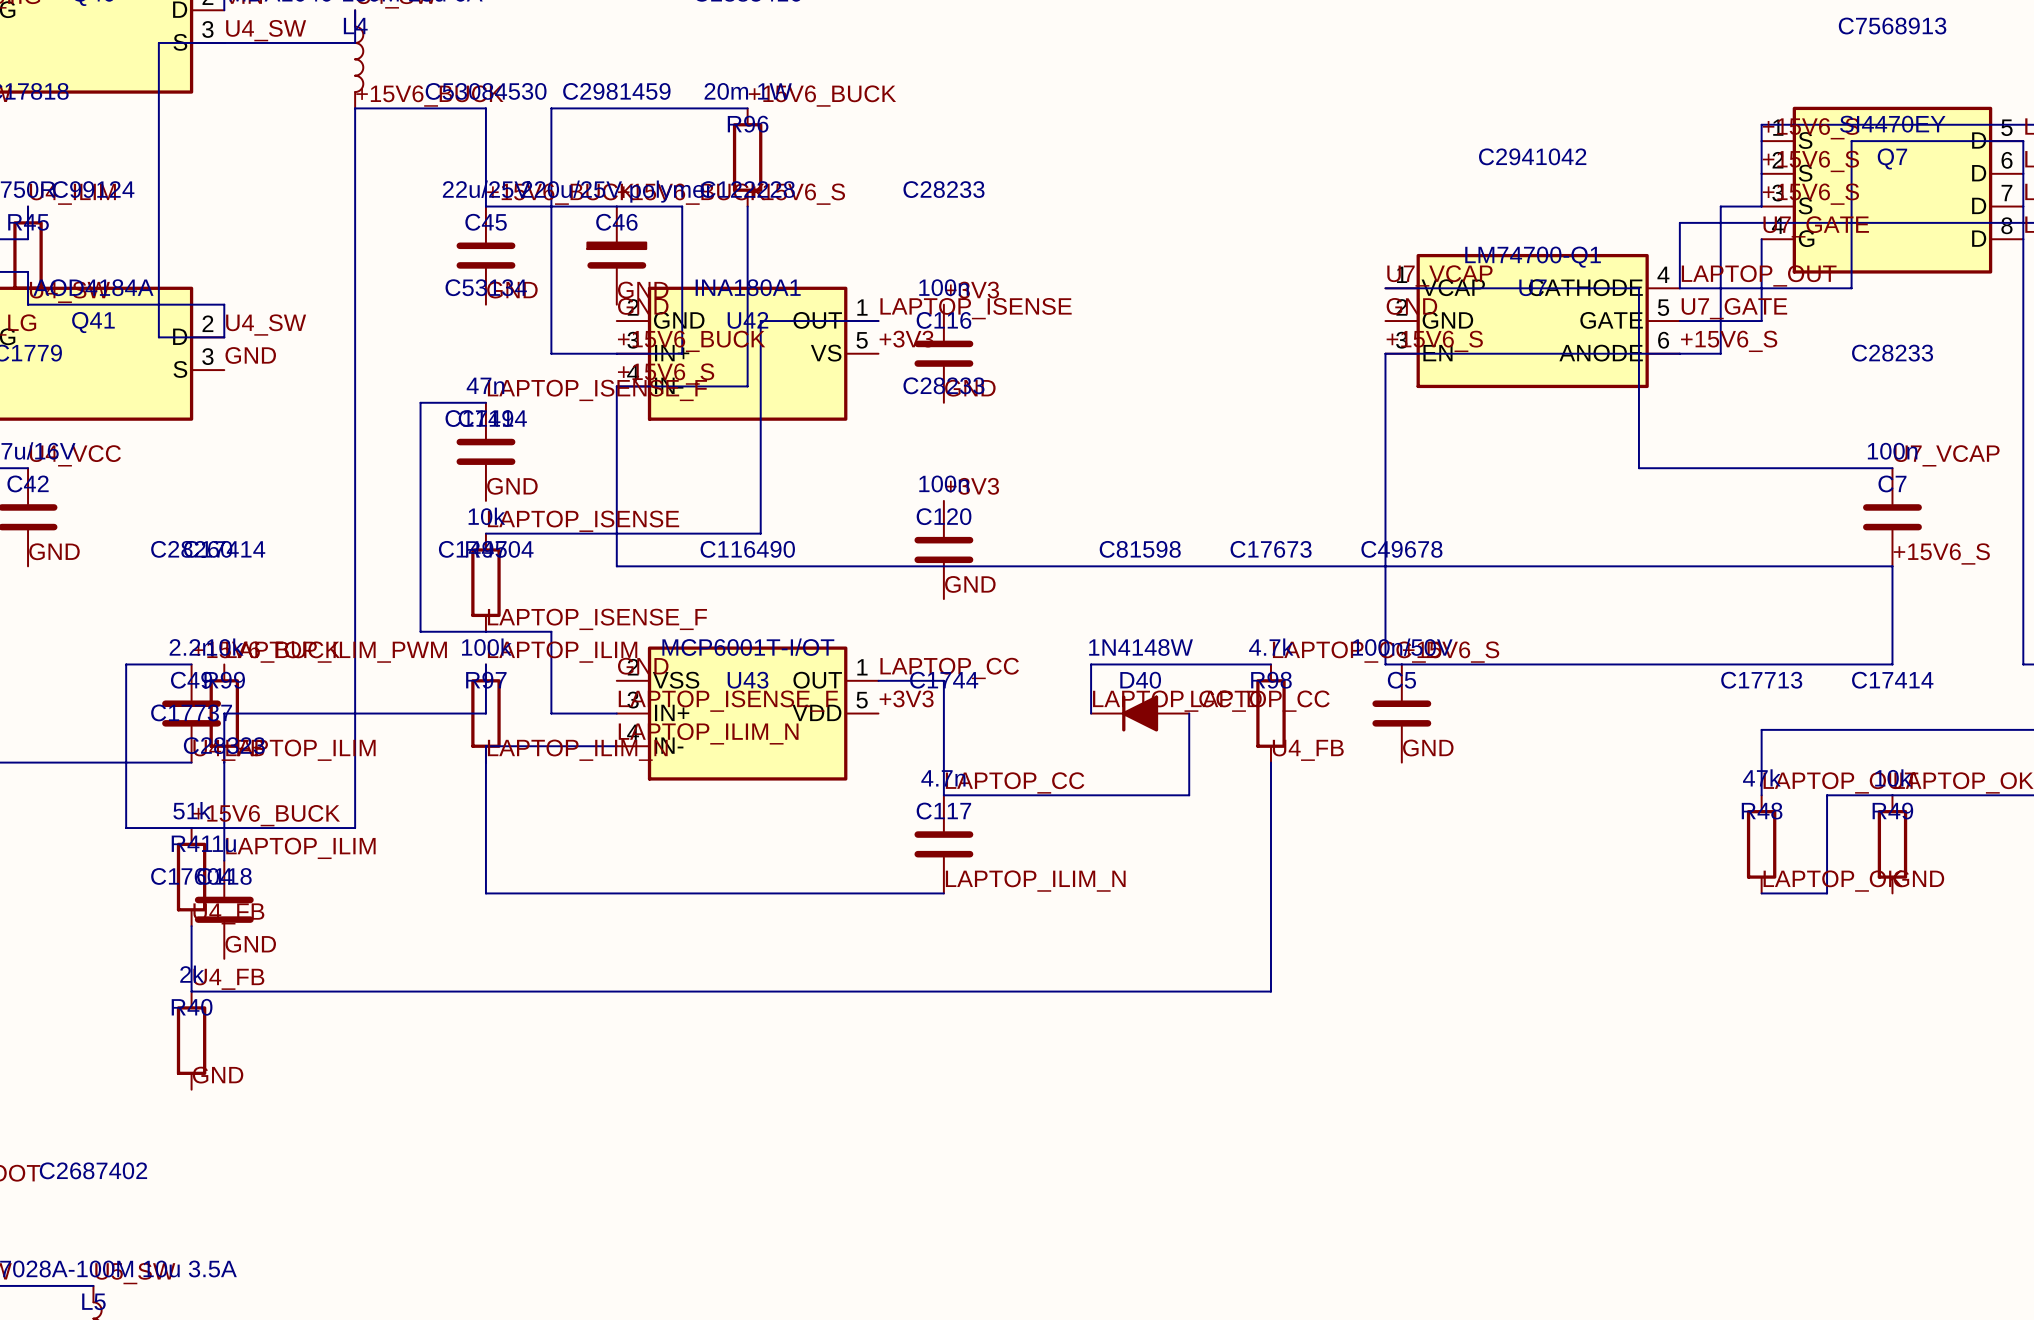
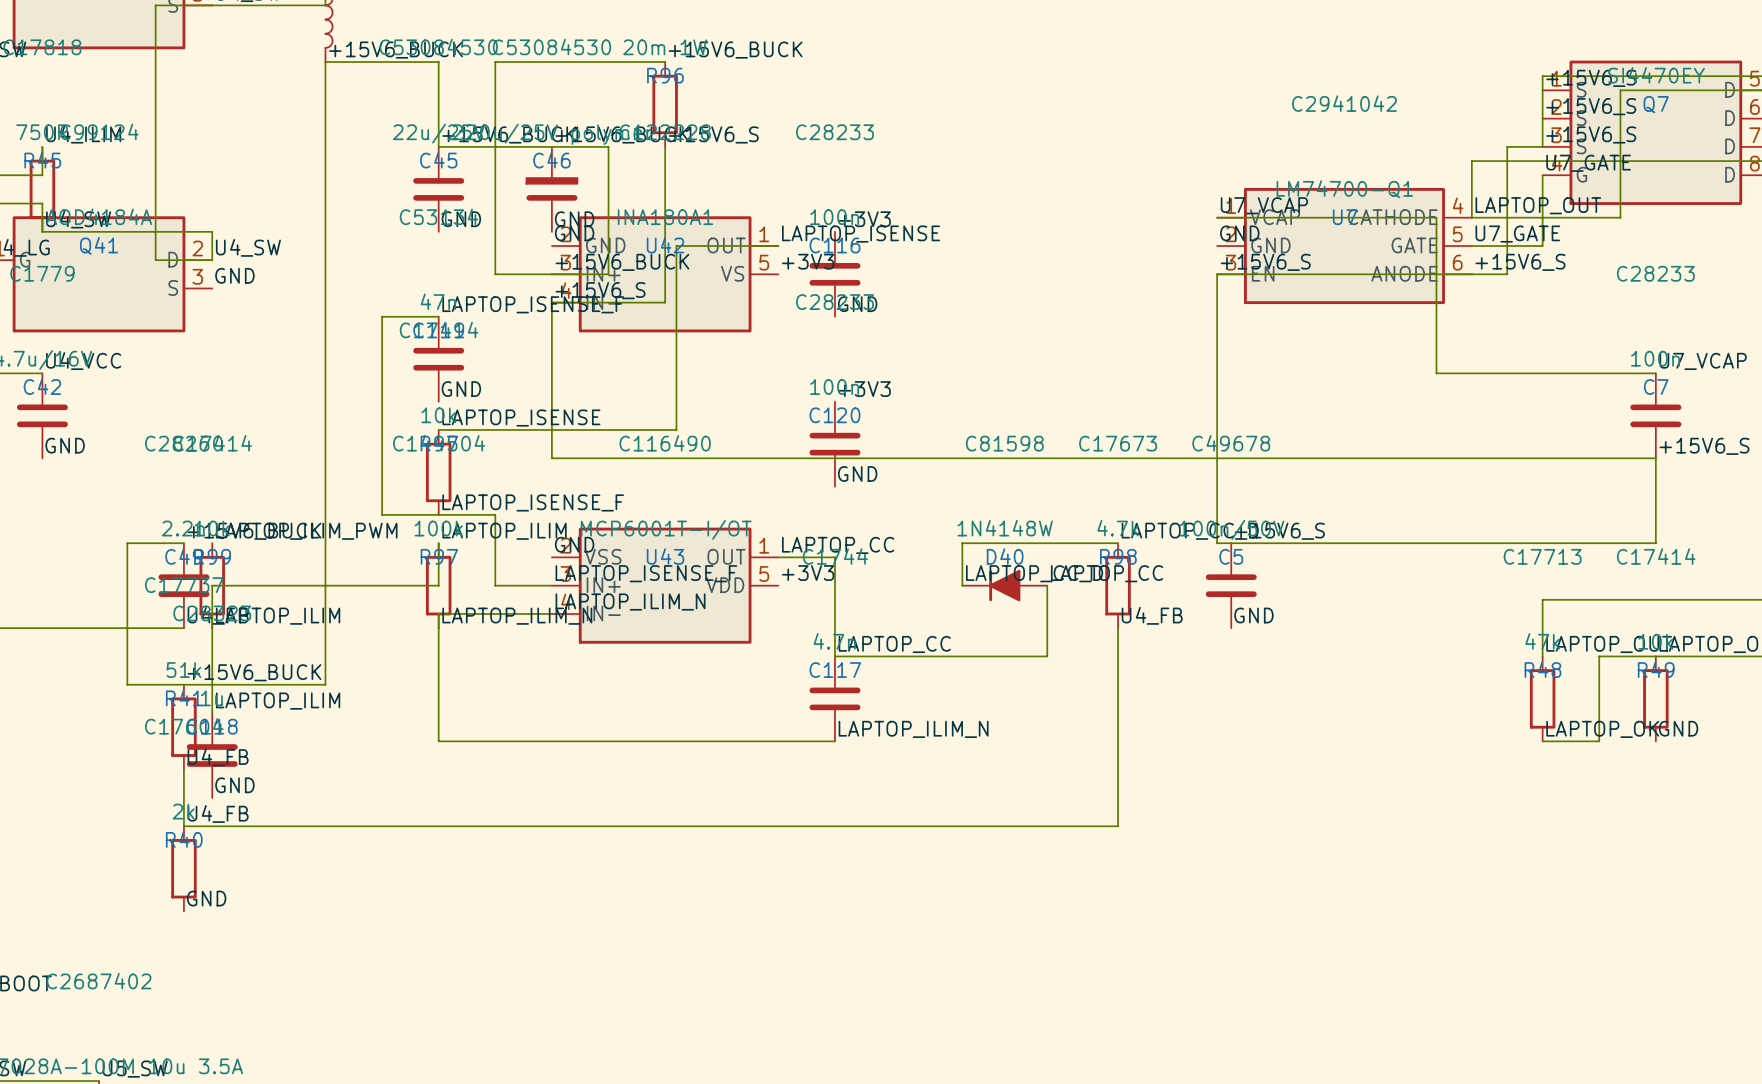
C46 text: C2981459 (616, 91) -> C53084530 (551, 47)

